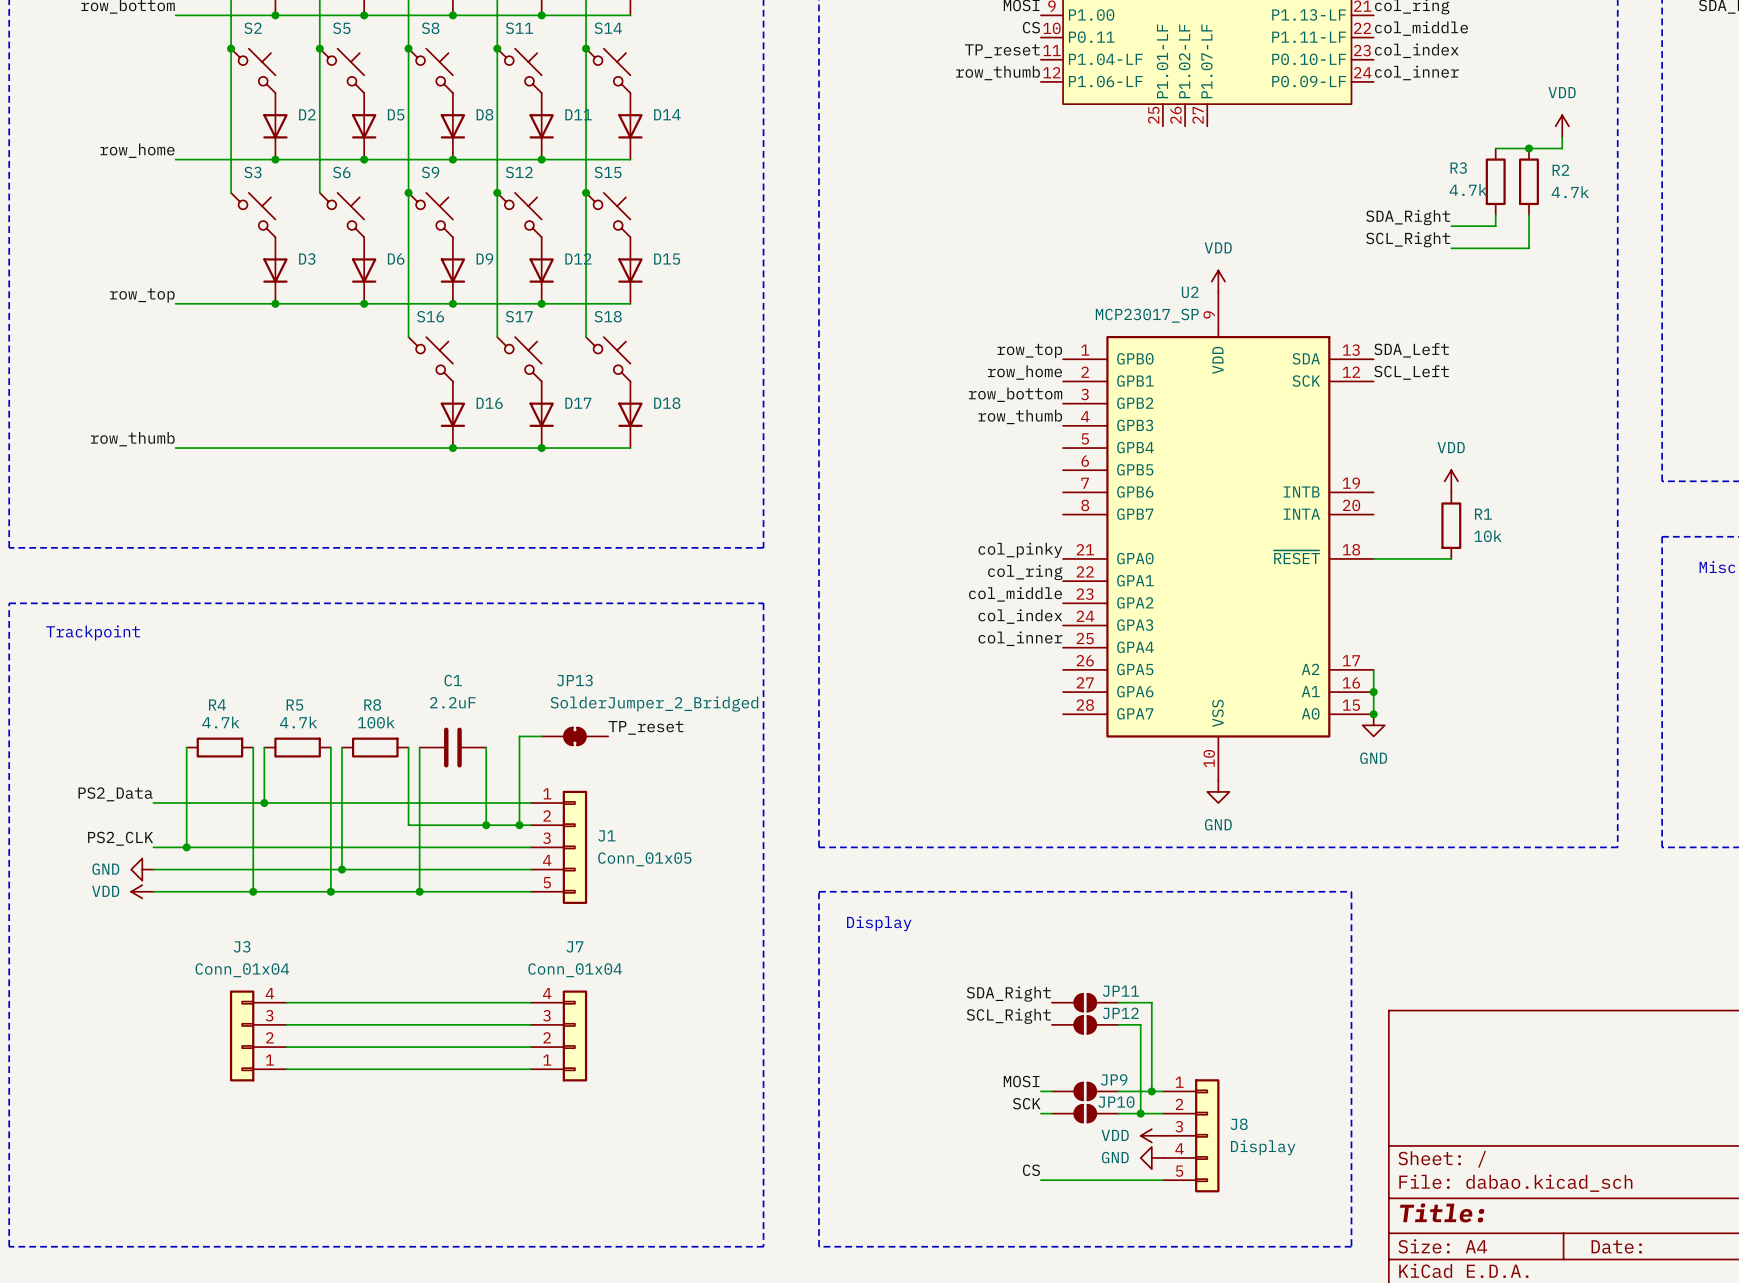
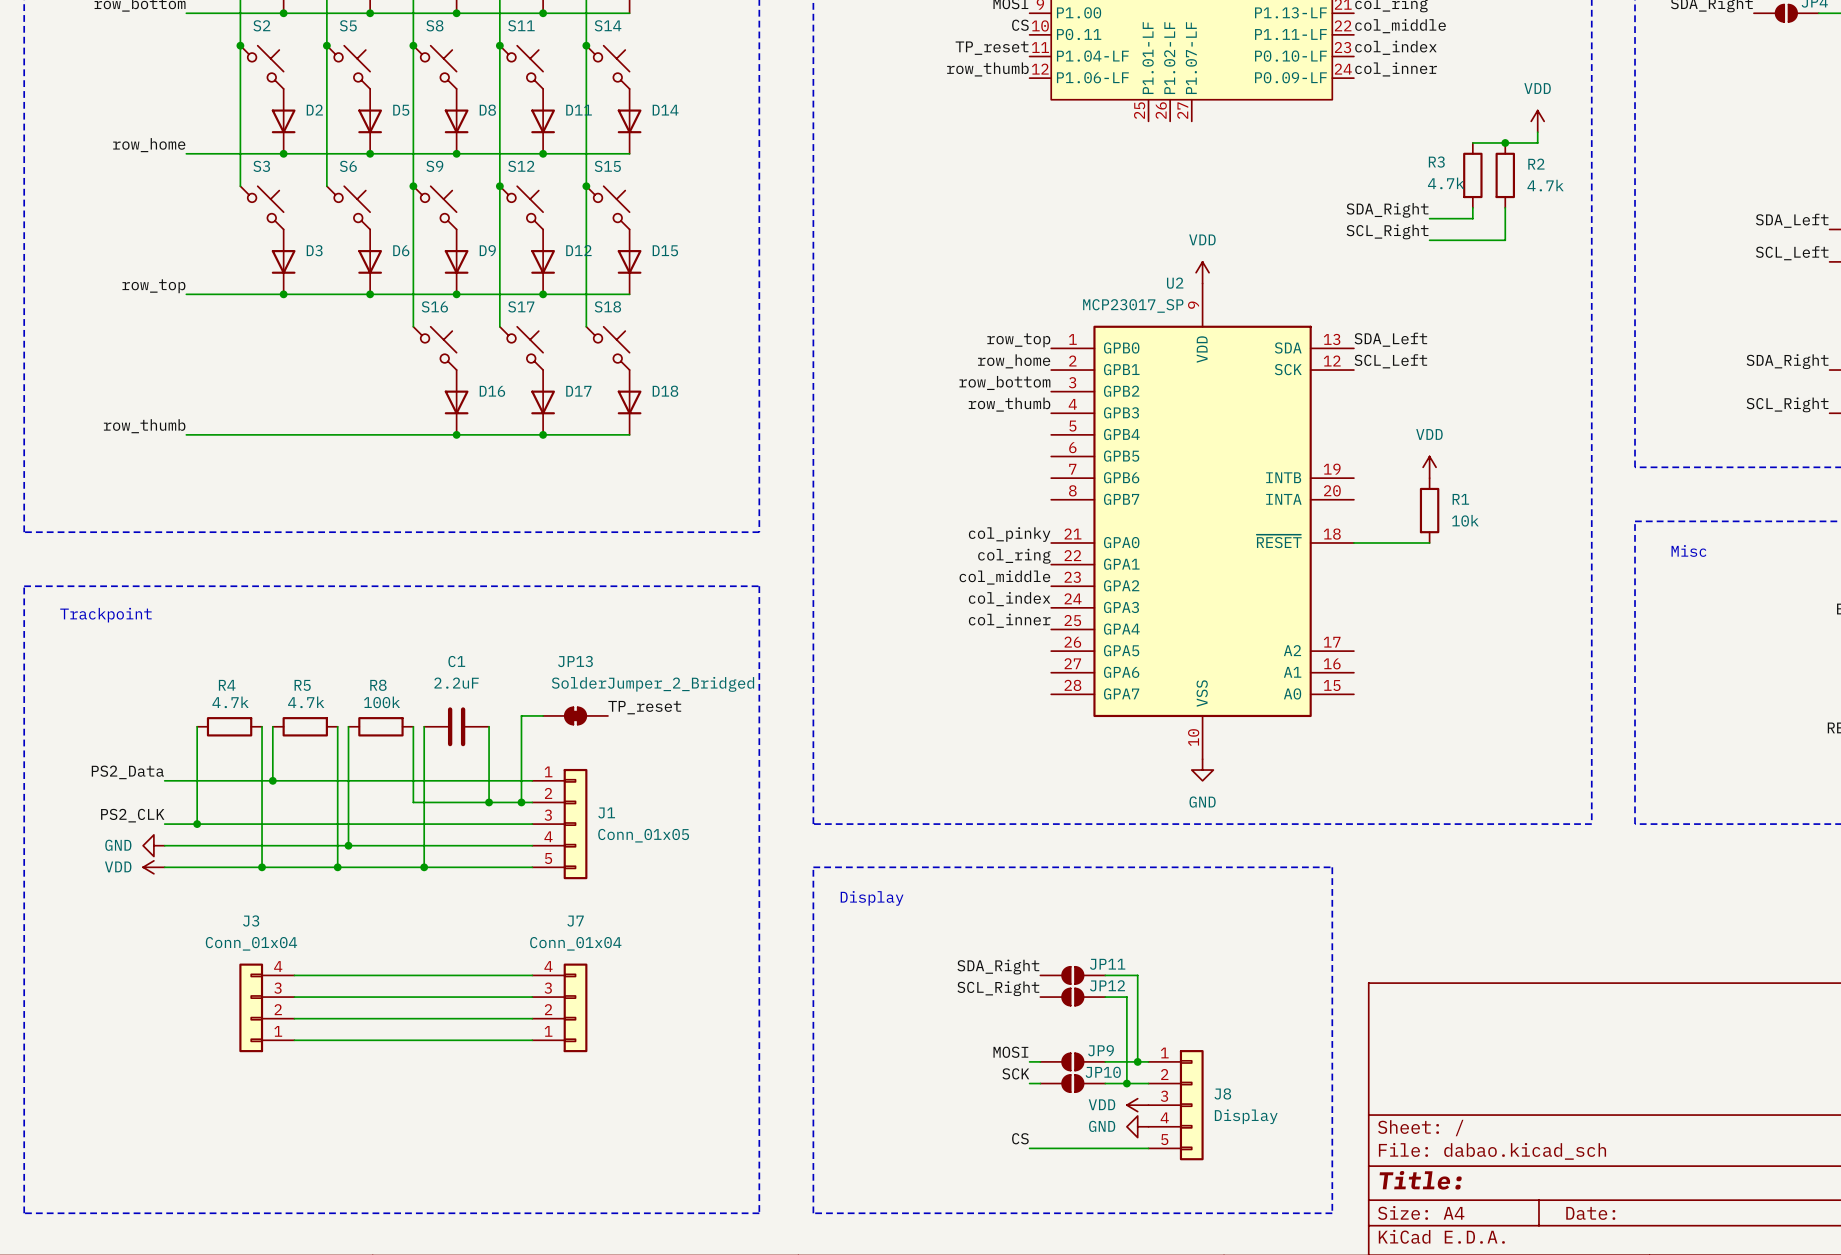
wire: (1373, 669) (1373, 714) -> none
junction: (1373, 692) -> none
junction: (1373, 714) -> none
power symbol: GND (1373, 725) -> none

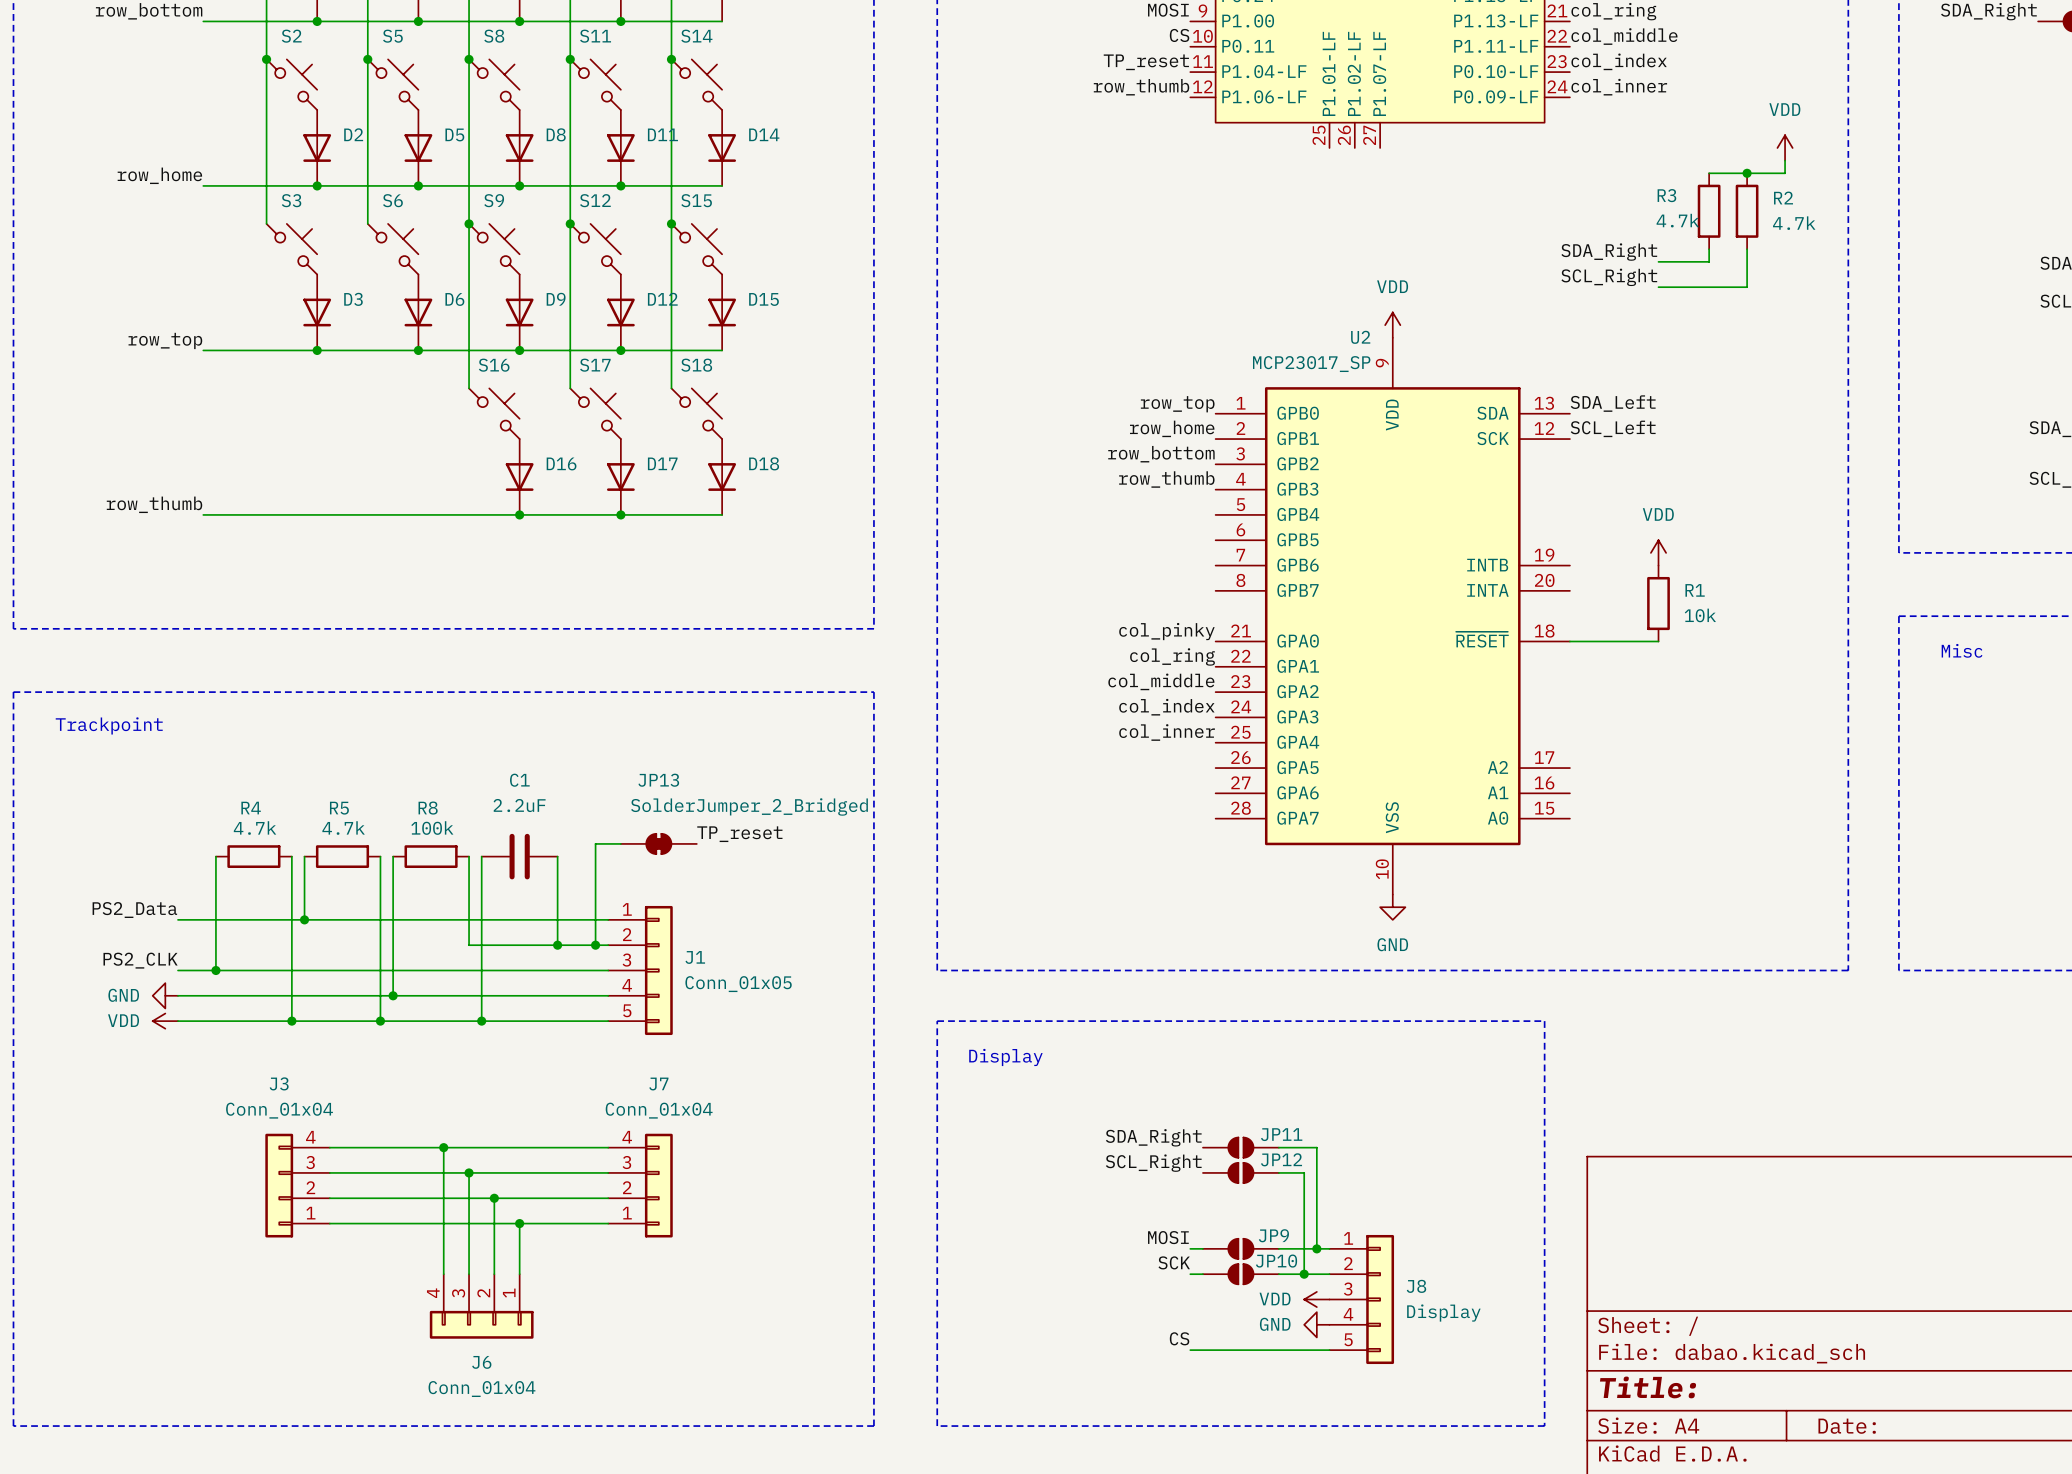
wire: none -> (443, 1147) (443, 1274)
junction: none -> (443, 1147)
wire: none -> (469, 1172) (469, 1274)
junction: none -> (469, 1172)
wire: none -> (494, 1198) (494, 1274)
junction: none -> (494, 1198)
wire: none -> (519, 1223) (519, 1274)
junction: none -> (519, 1223)
J6: none -> Conn_01x04 (481, 1306)

